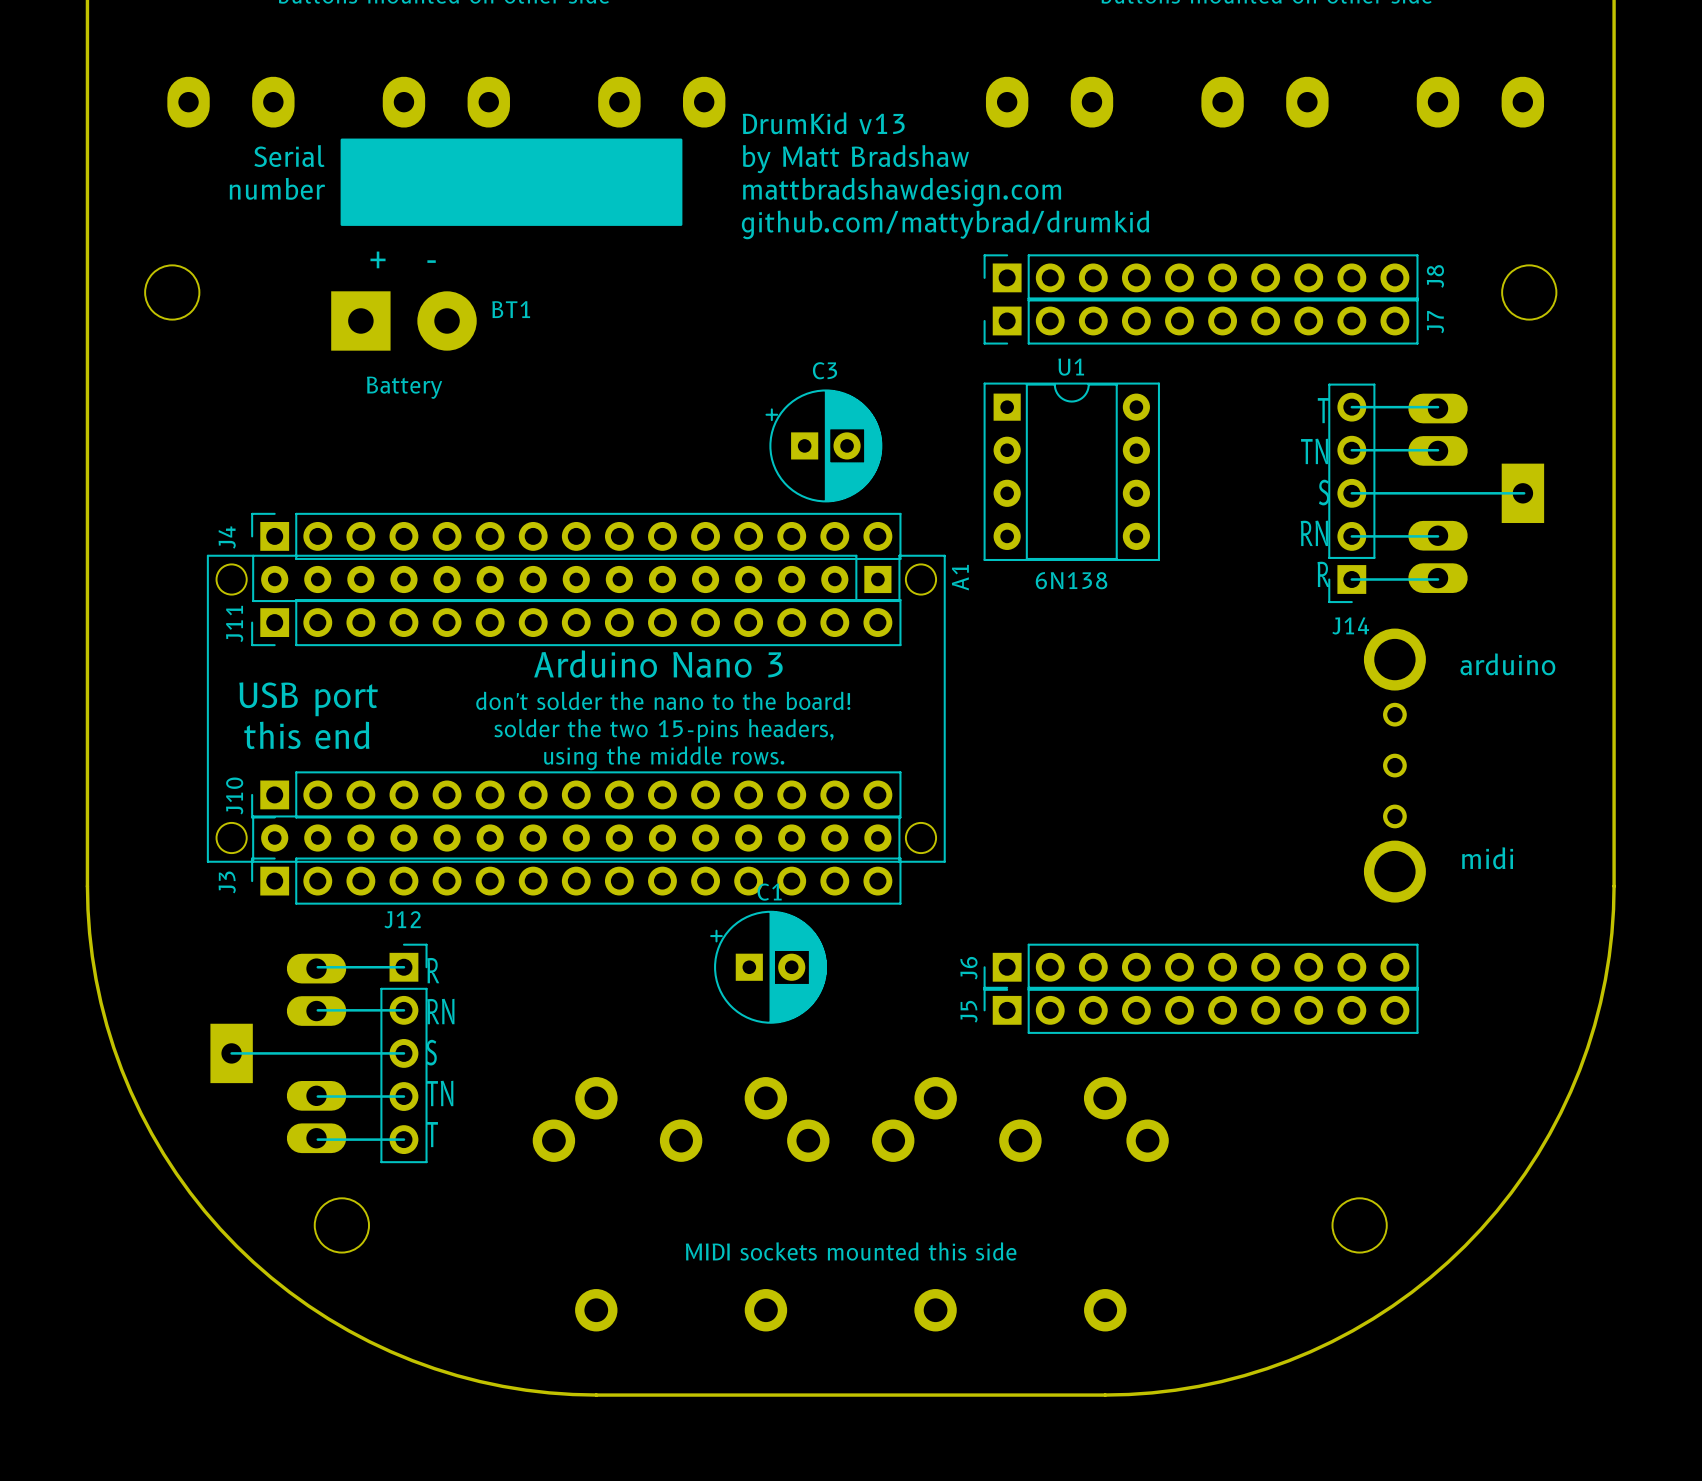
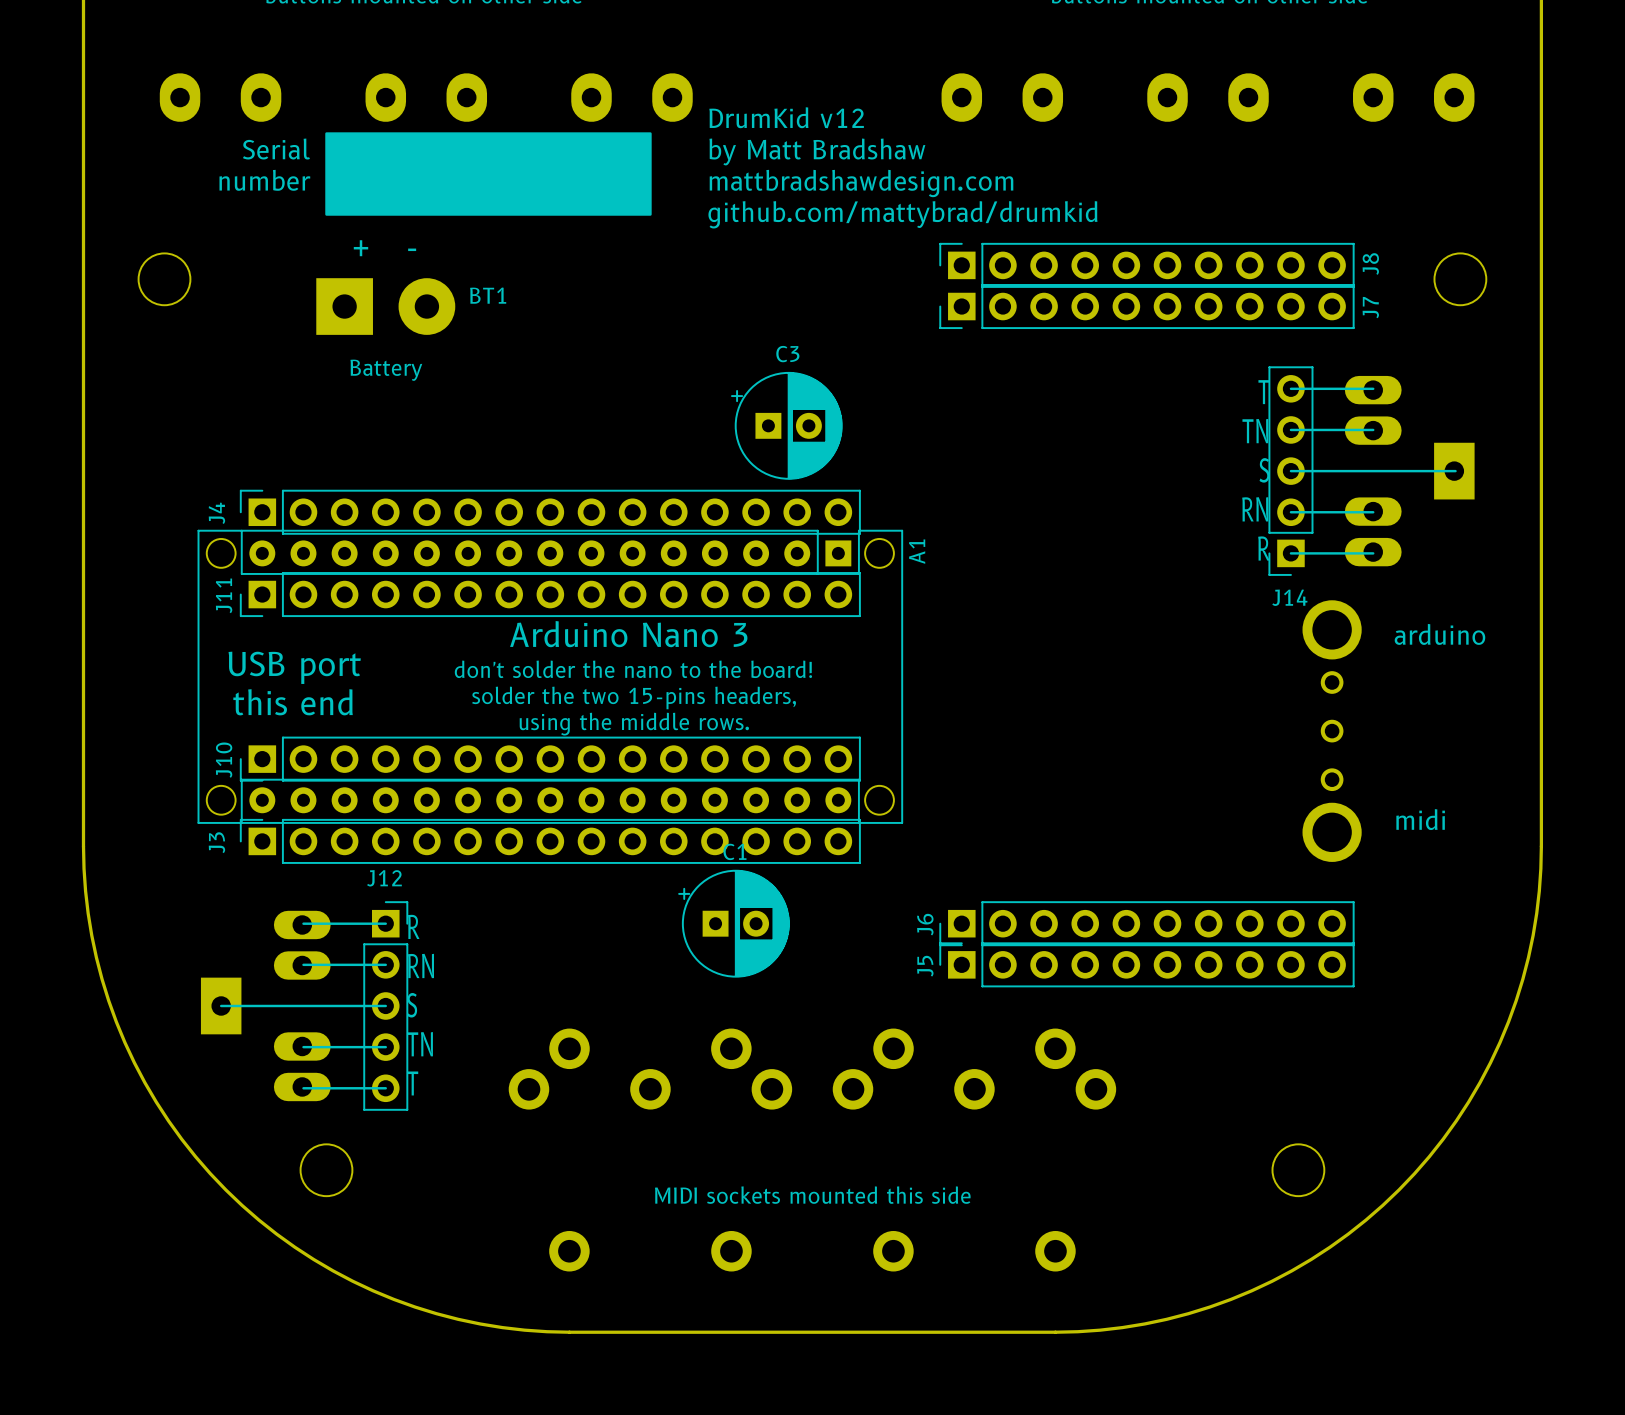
text: DrumKid v13 (823, 123) -> DrumKid v12 (786, 117)
U1: (1071, 471) -> none
text: 6N138 (1071, 580) -> none

